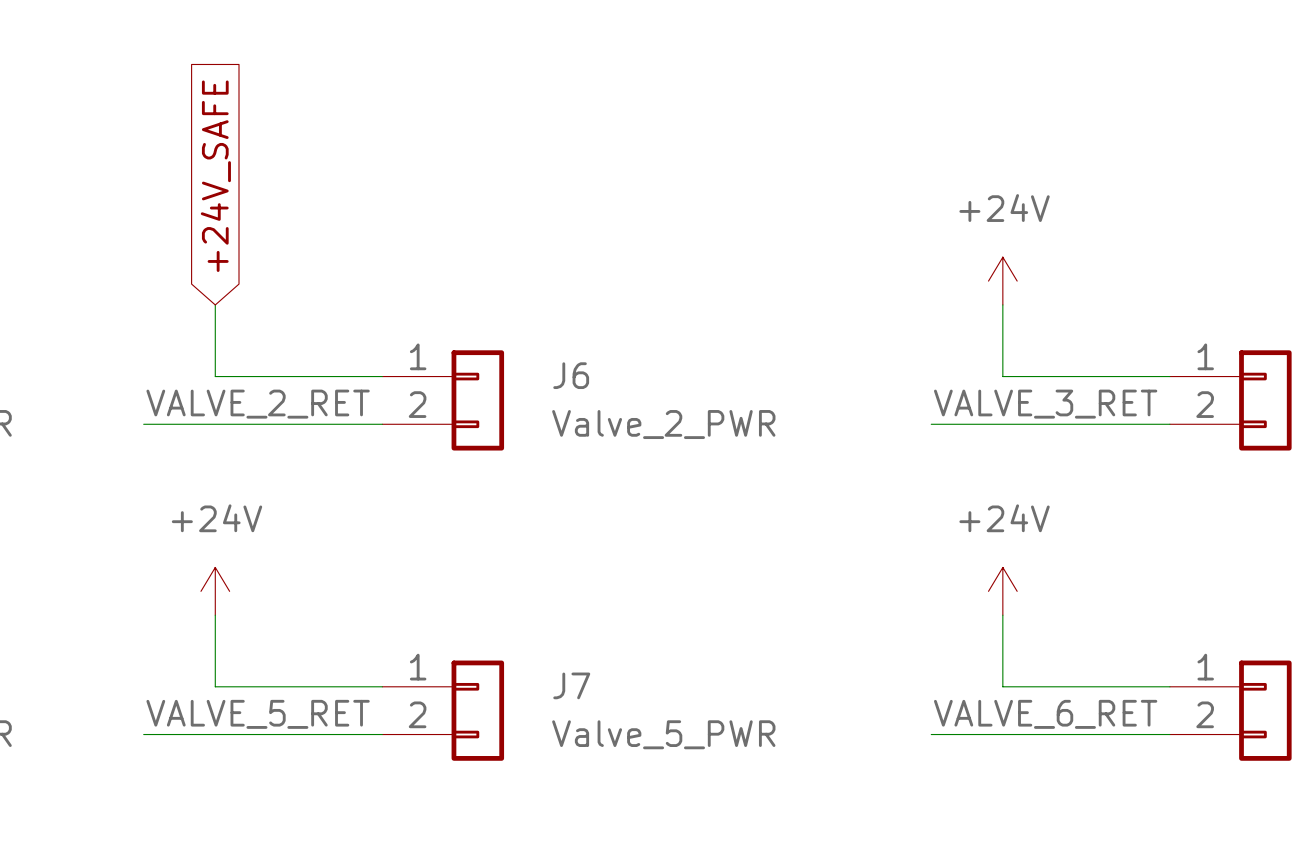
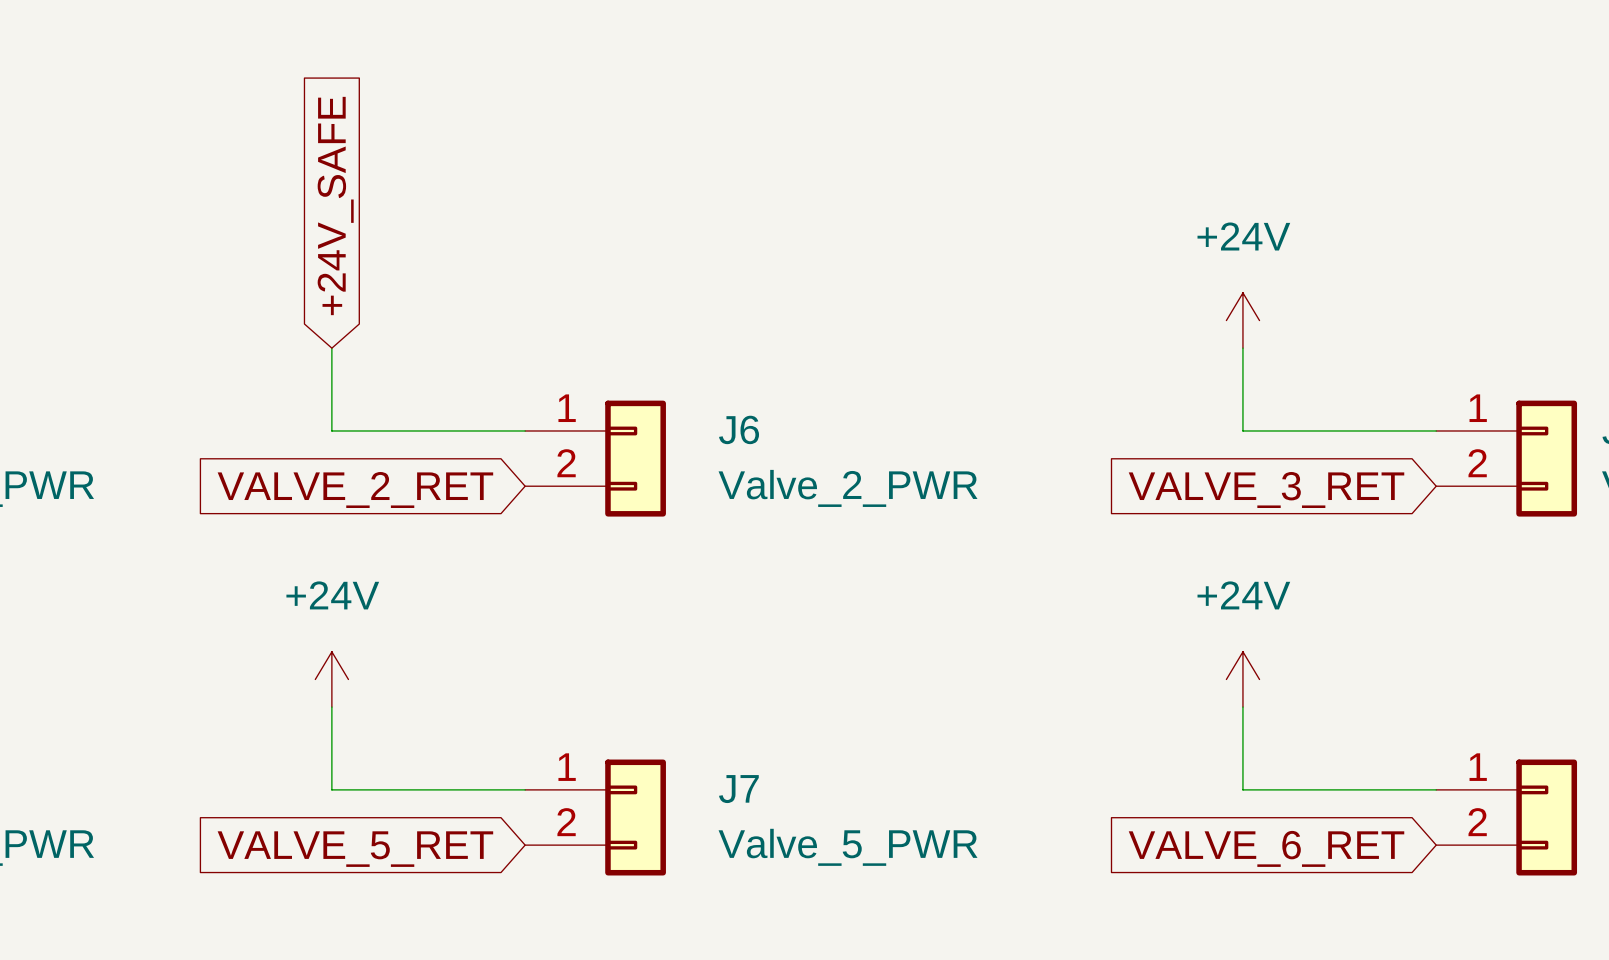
label: VALVE_2_RET (258, 404) -> none
label: VALVE_3_RET (1045, 404) -> none
wire: (143, 424) (382, 424) -> none
wire: (931, 424) (1169, 424) -> none
global label: none -> VALVE_2_RET (355, 489)
global label: none -> VALVE_3_RET (1266, 489)
label: VALVE_5_RET (258, 714) -> none
label: VALVE_6_RET (1045, 714) -> none
wire: (143, 734) (382, 734) -> none
wire: (931, 734) (1169, 734) -> none
global label: none -> VALVE_5_RET (355, 849)
global label: none -> VALVE_6_RET (1266, 848)

